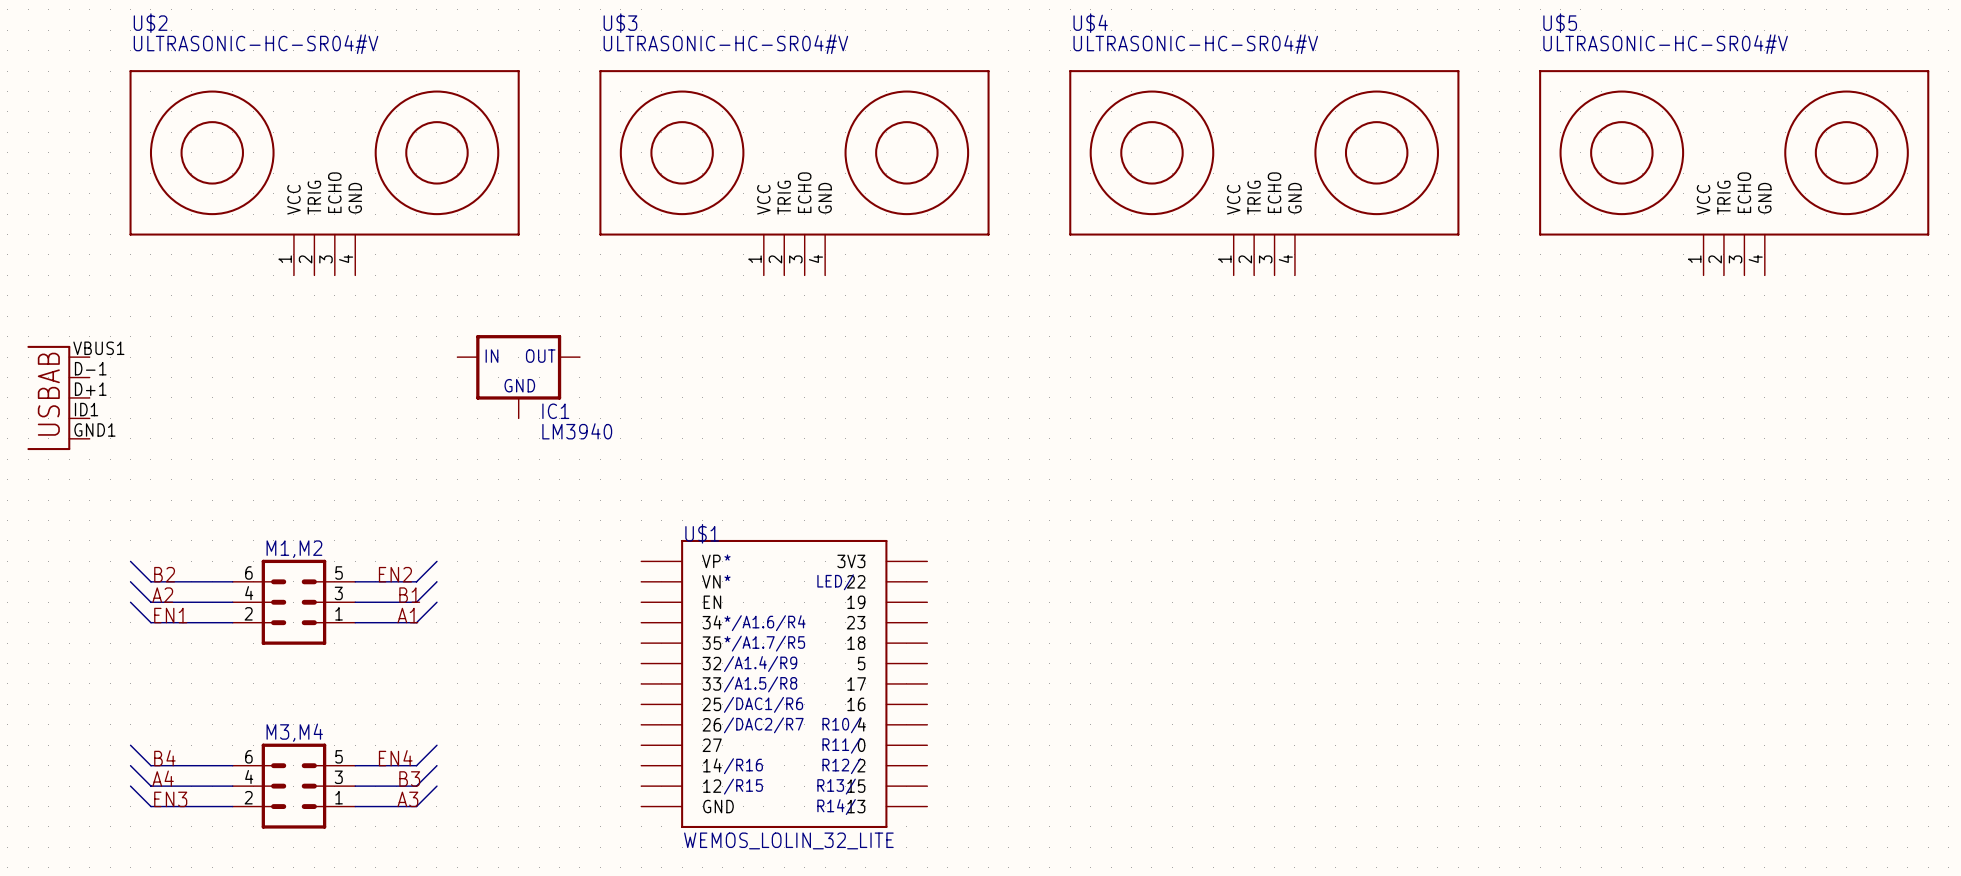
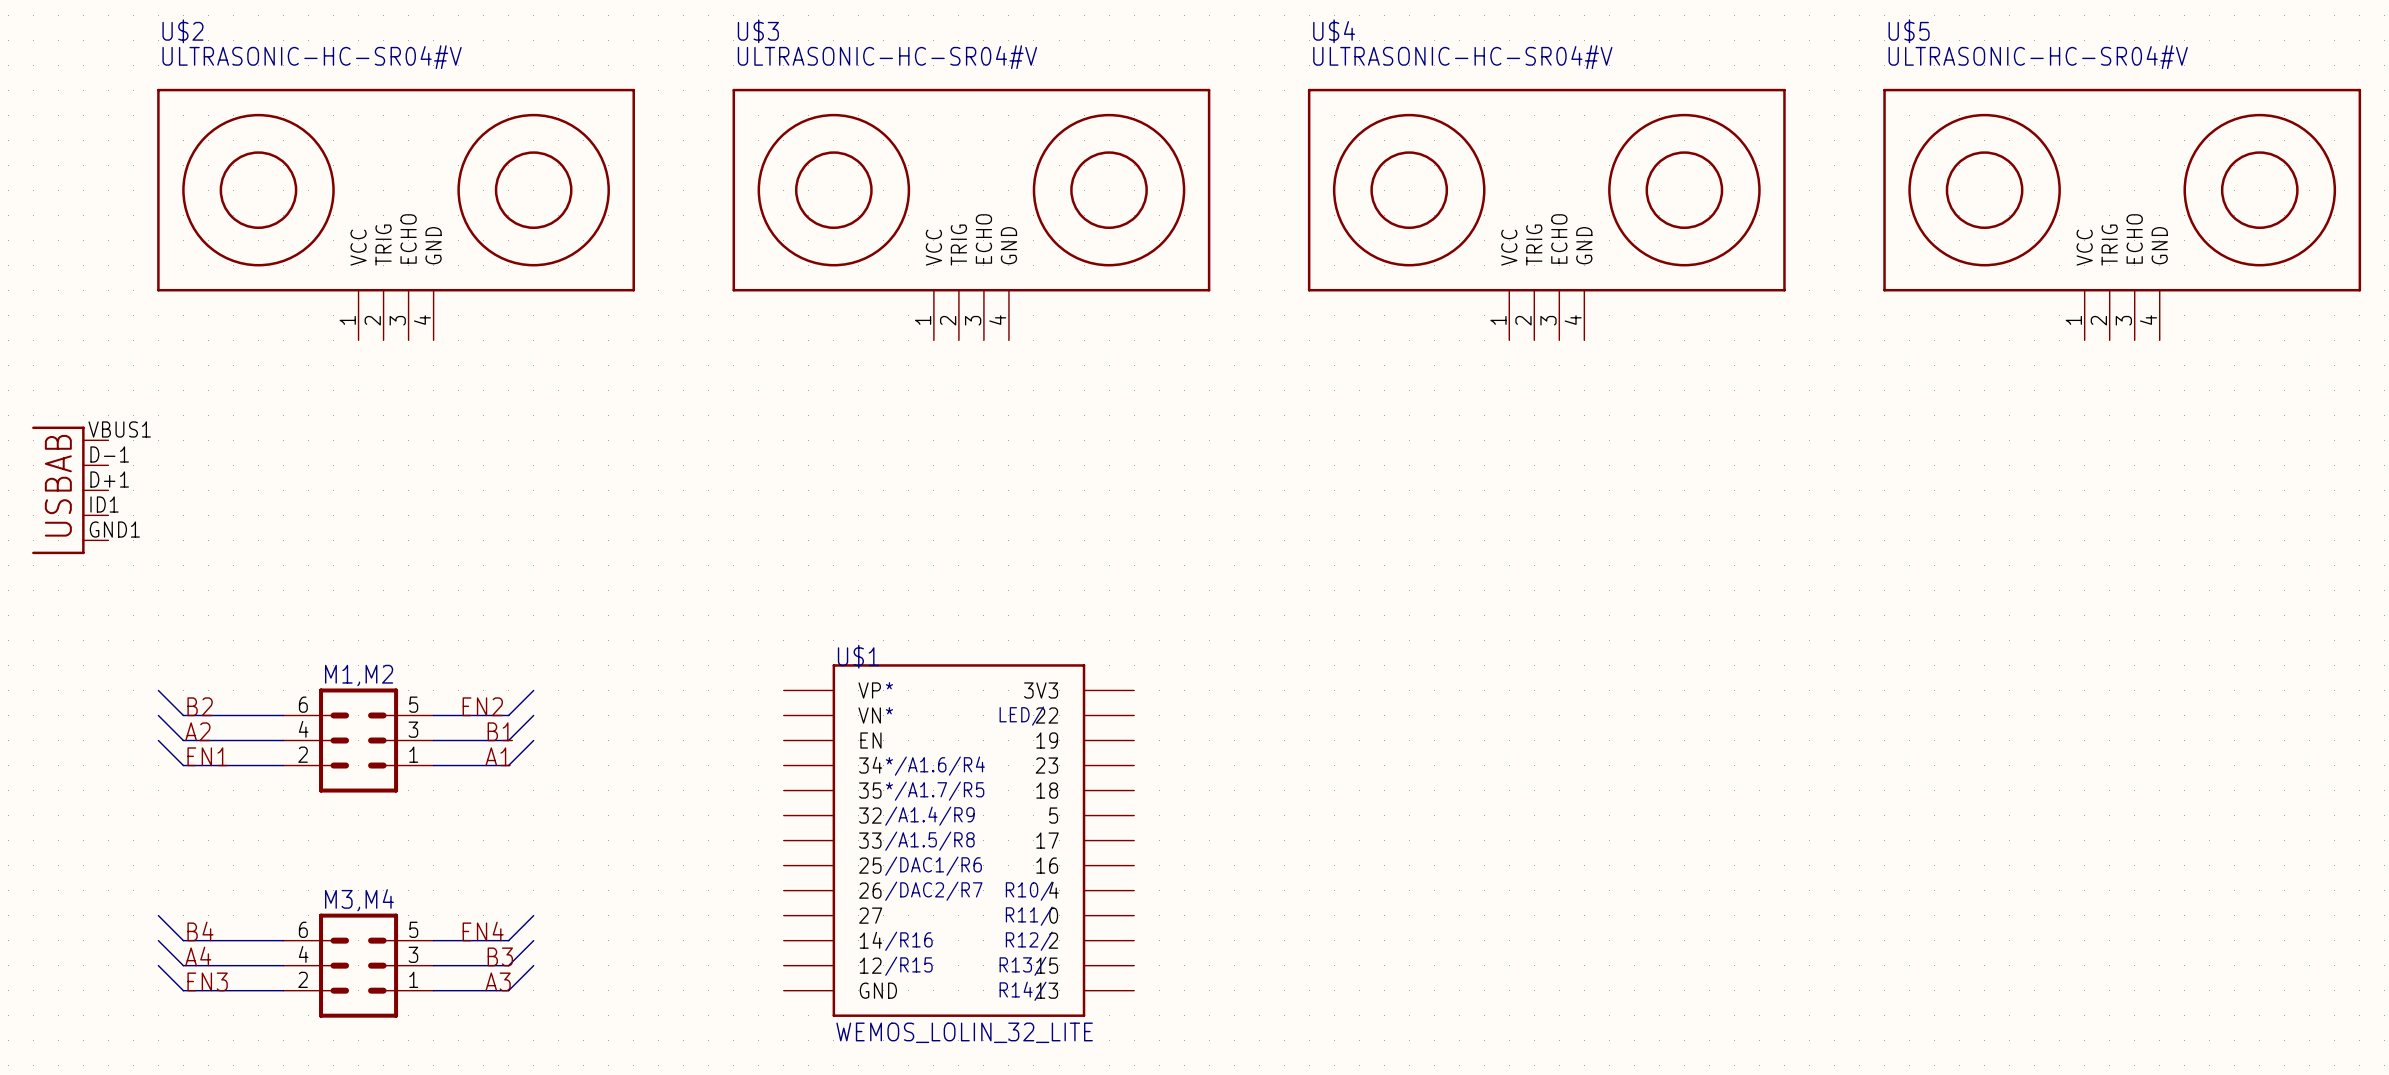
IC1: LM3940 (518, 376) -> none

